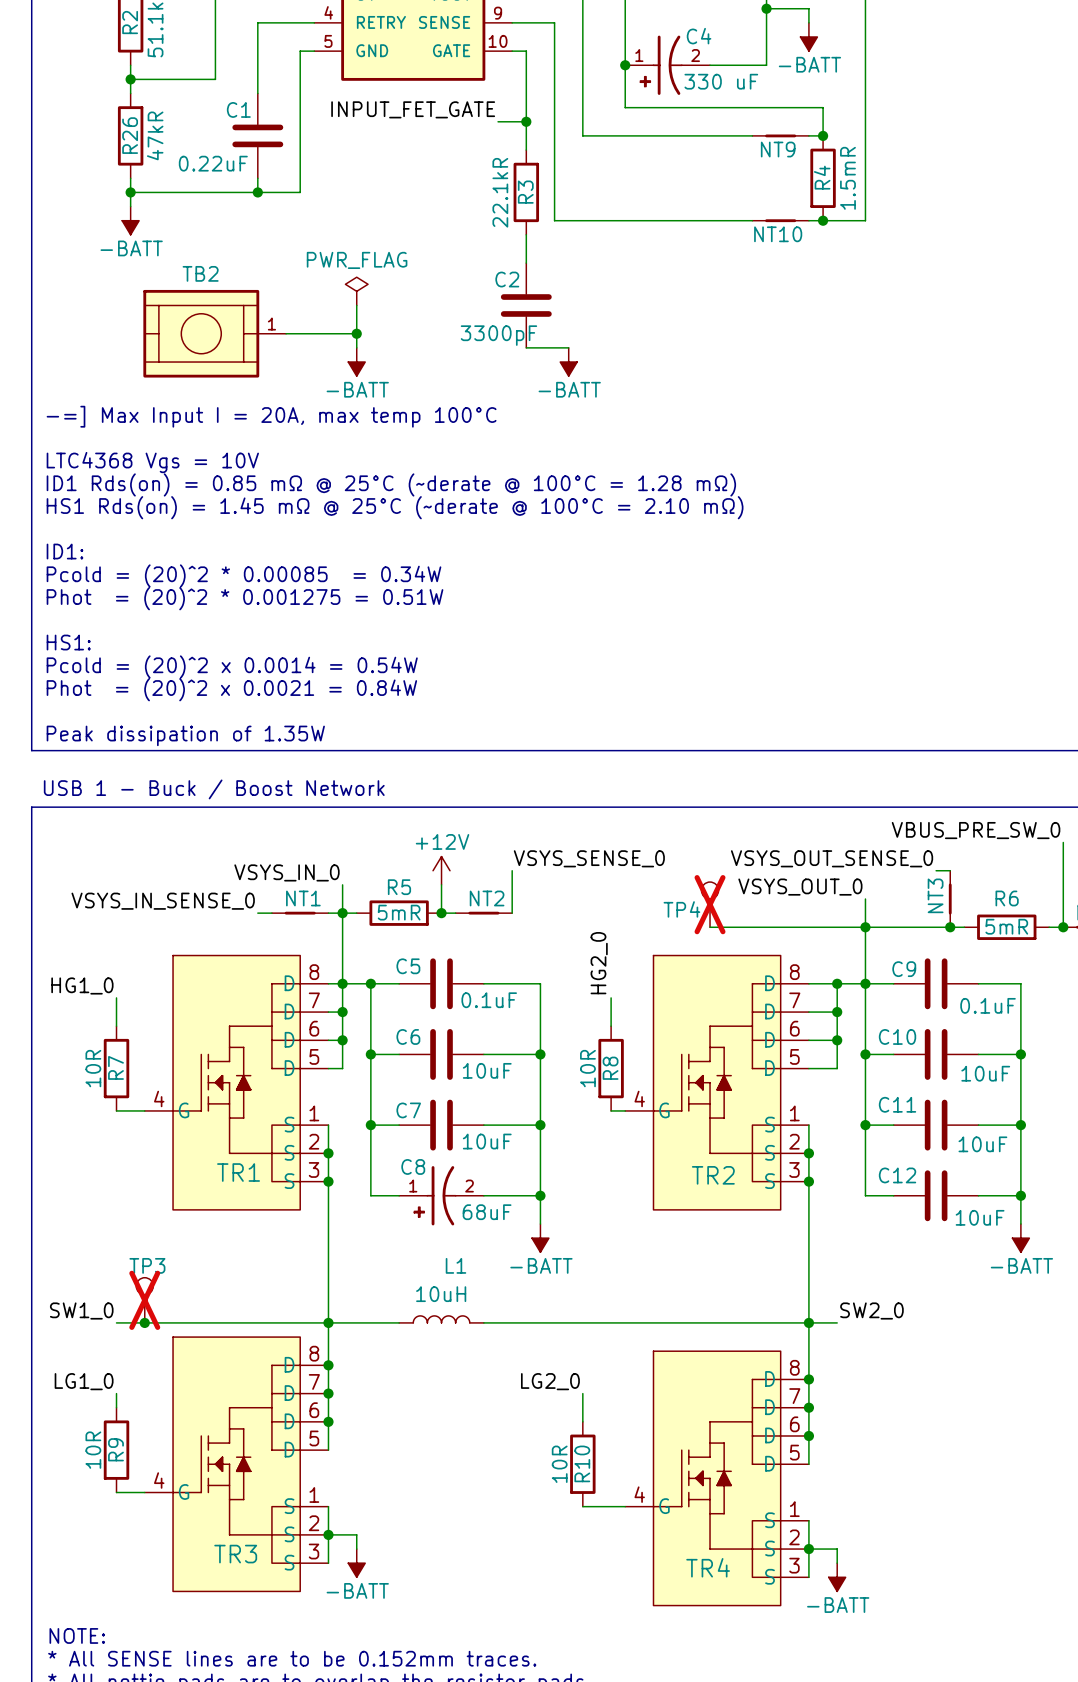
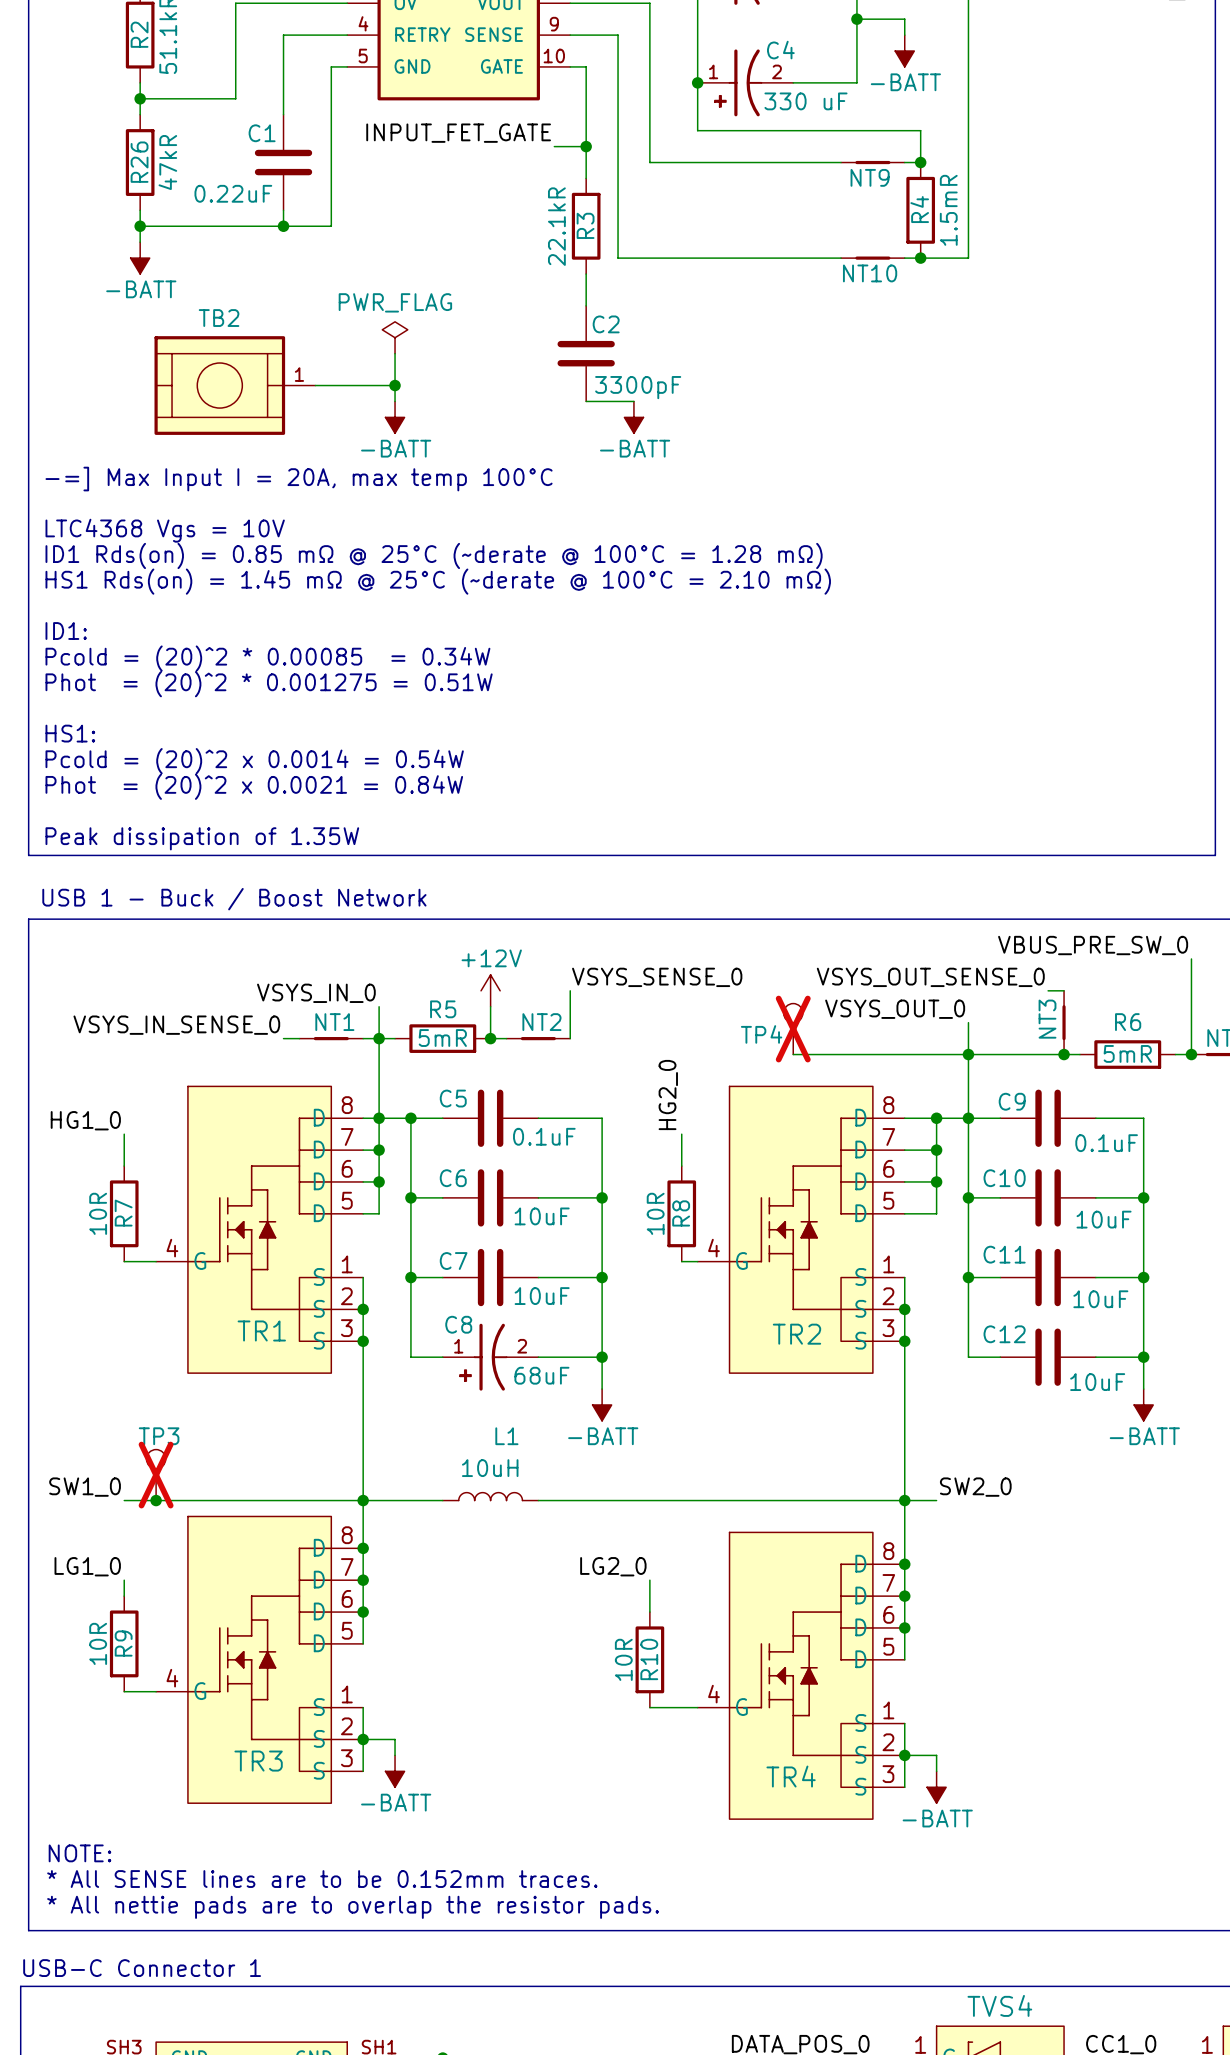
C2 name position: C2 (507, 279) -> C2 (606, 324)
C2 value position: 3300pF (498, 335) -> 3300pF (638, 387)

